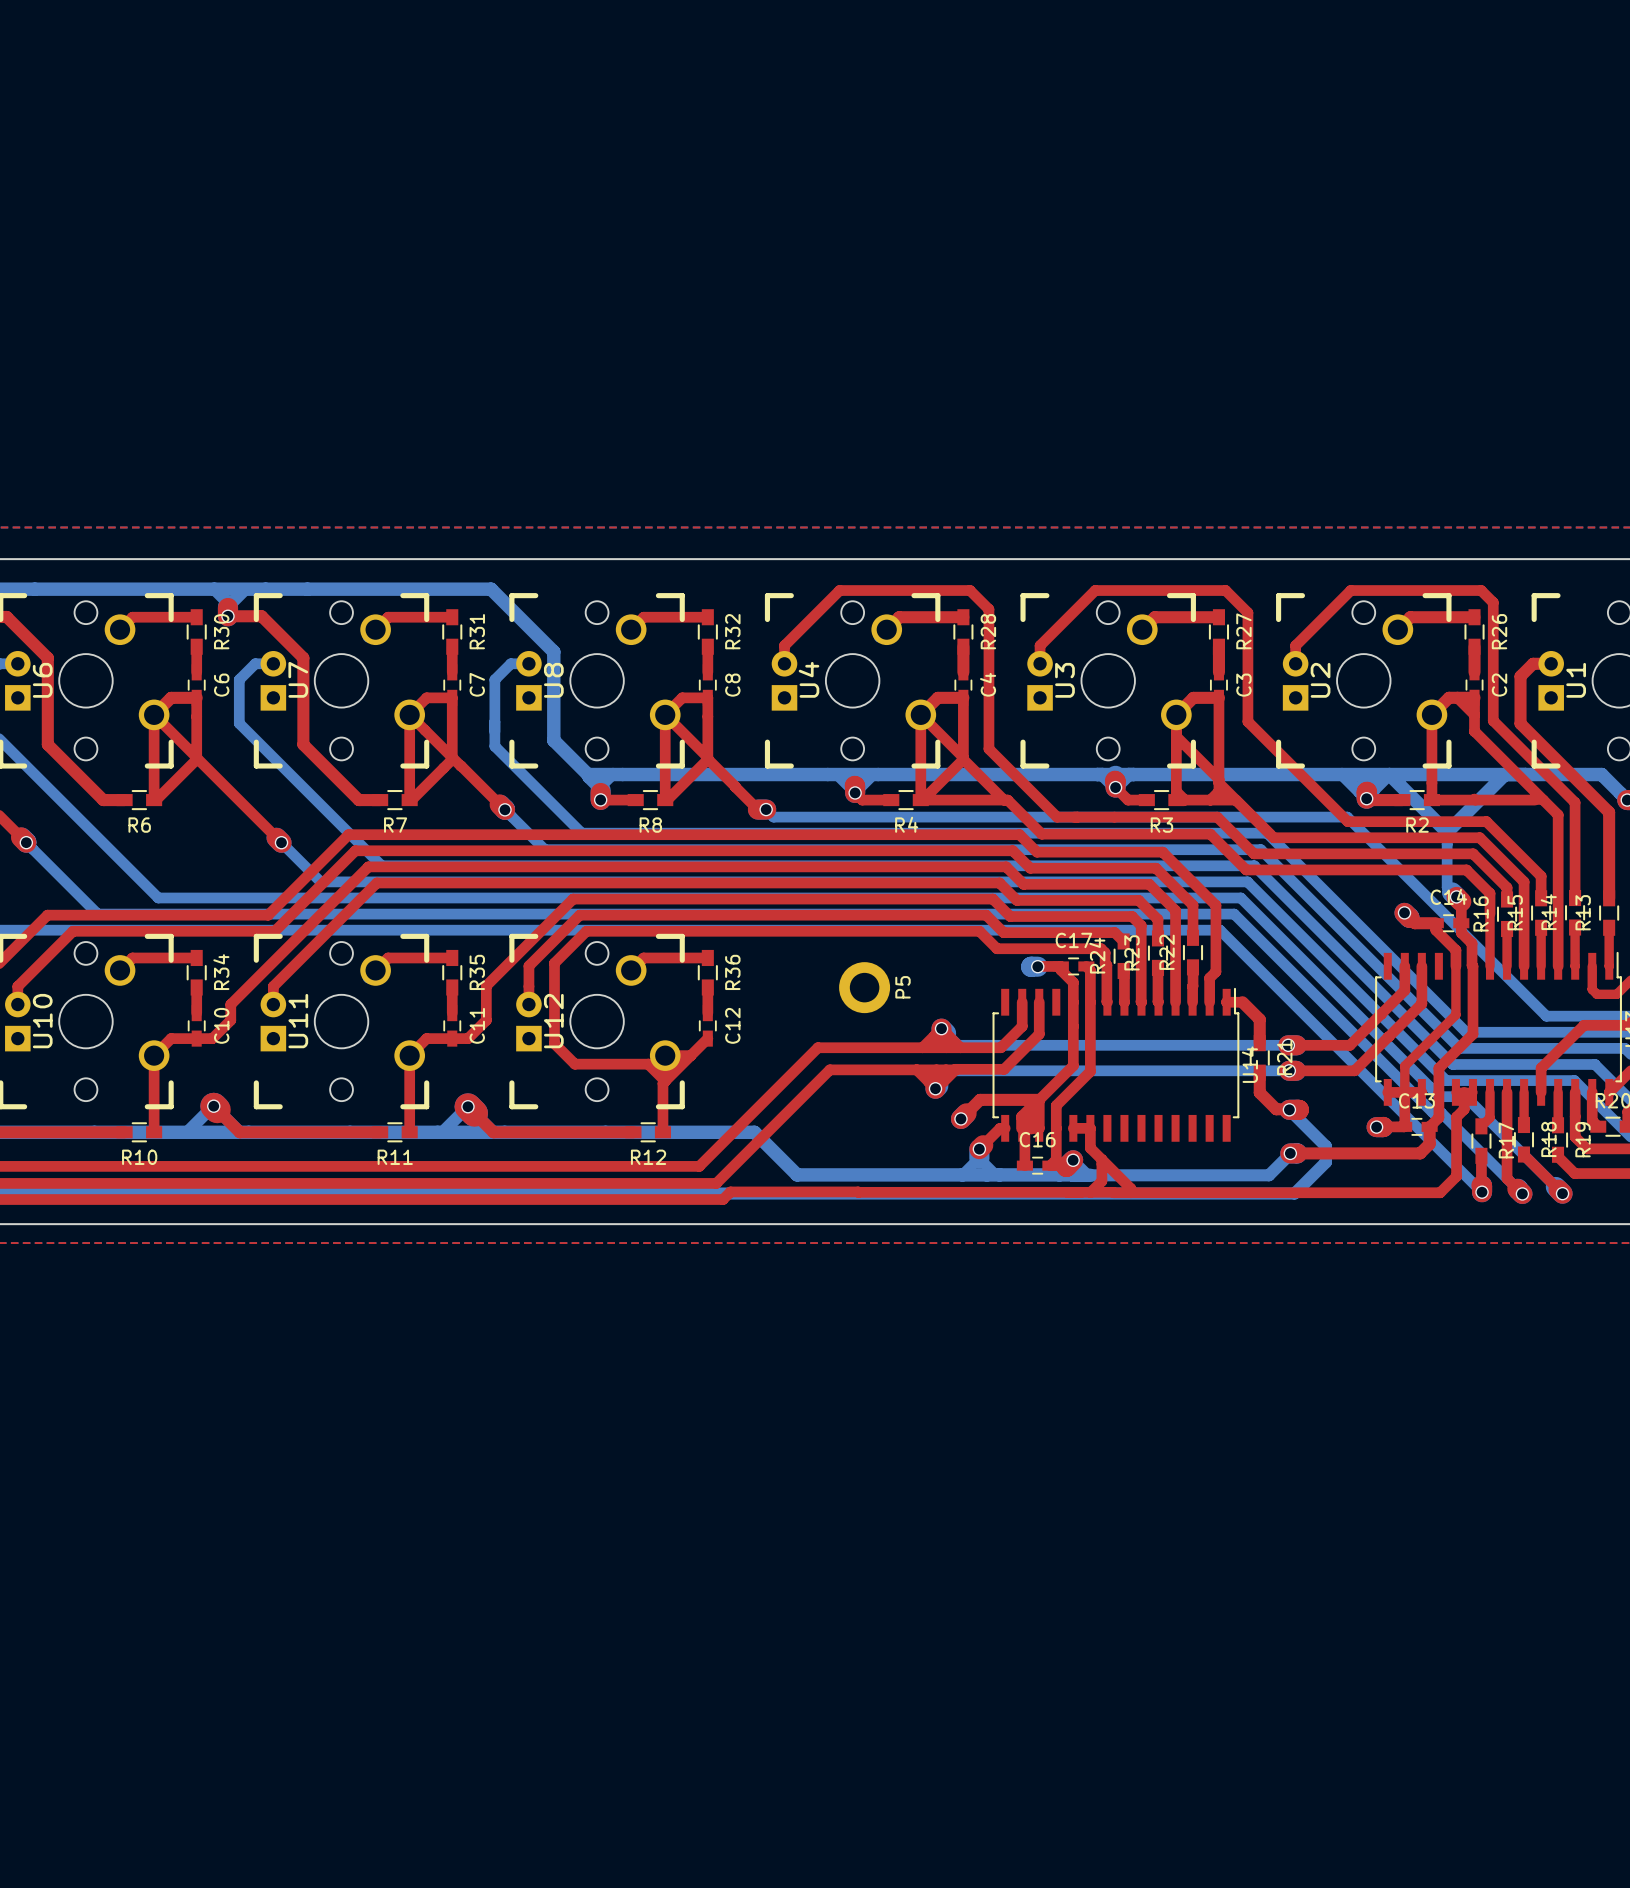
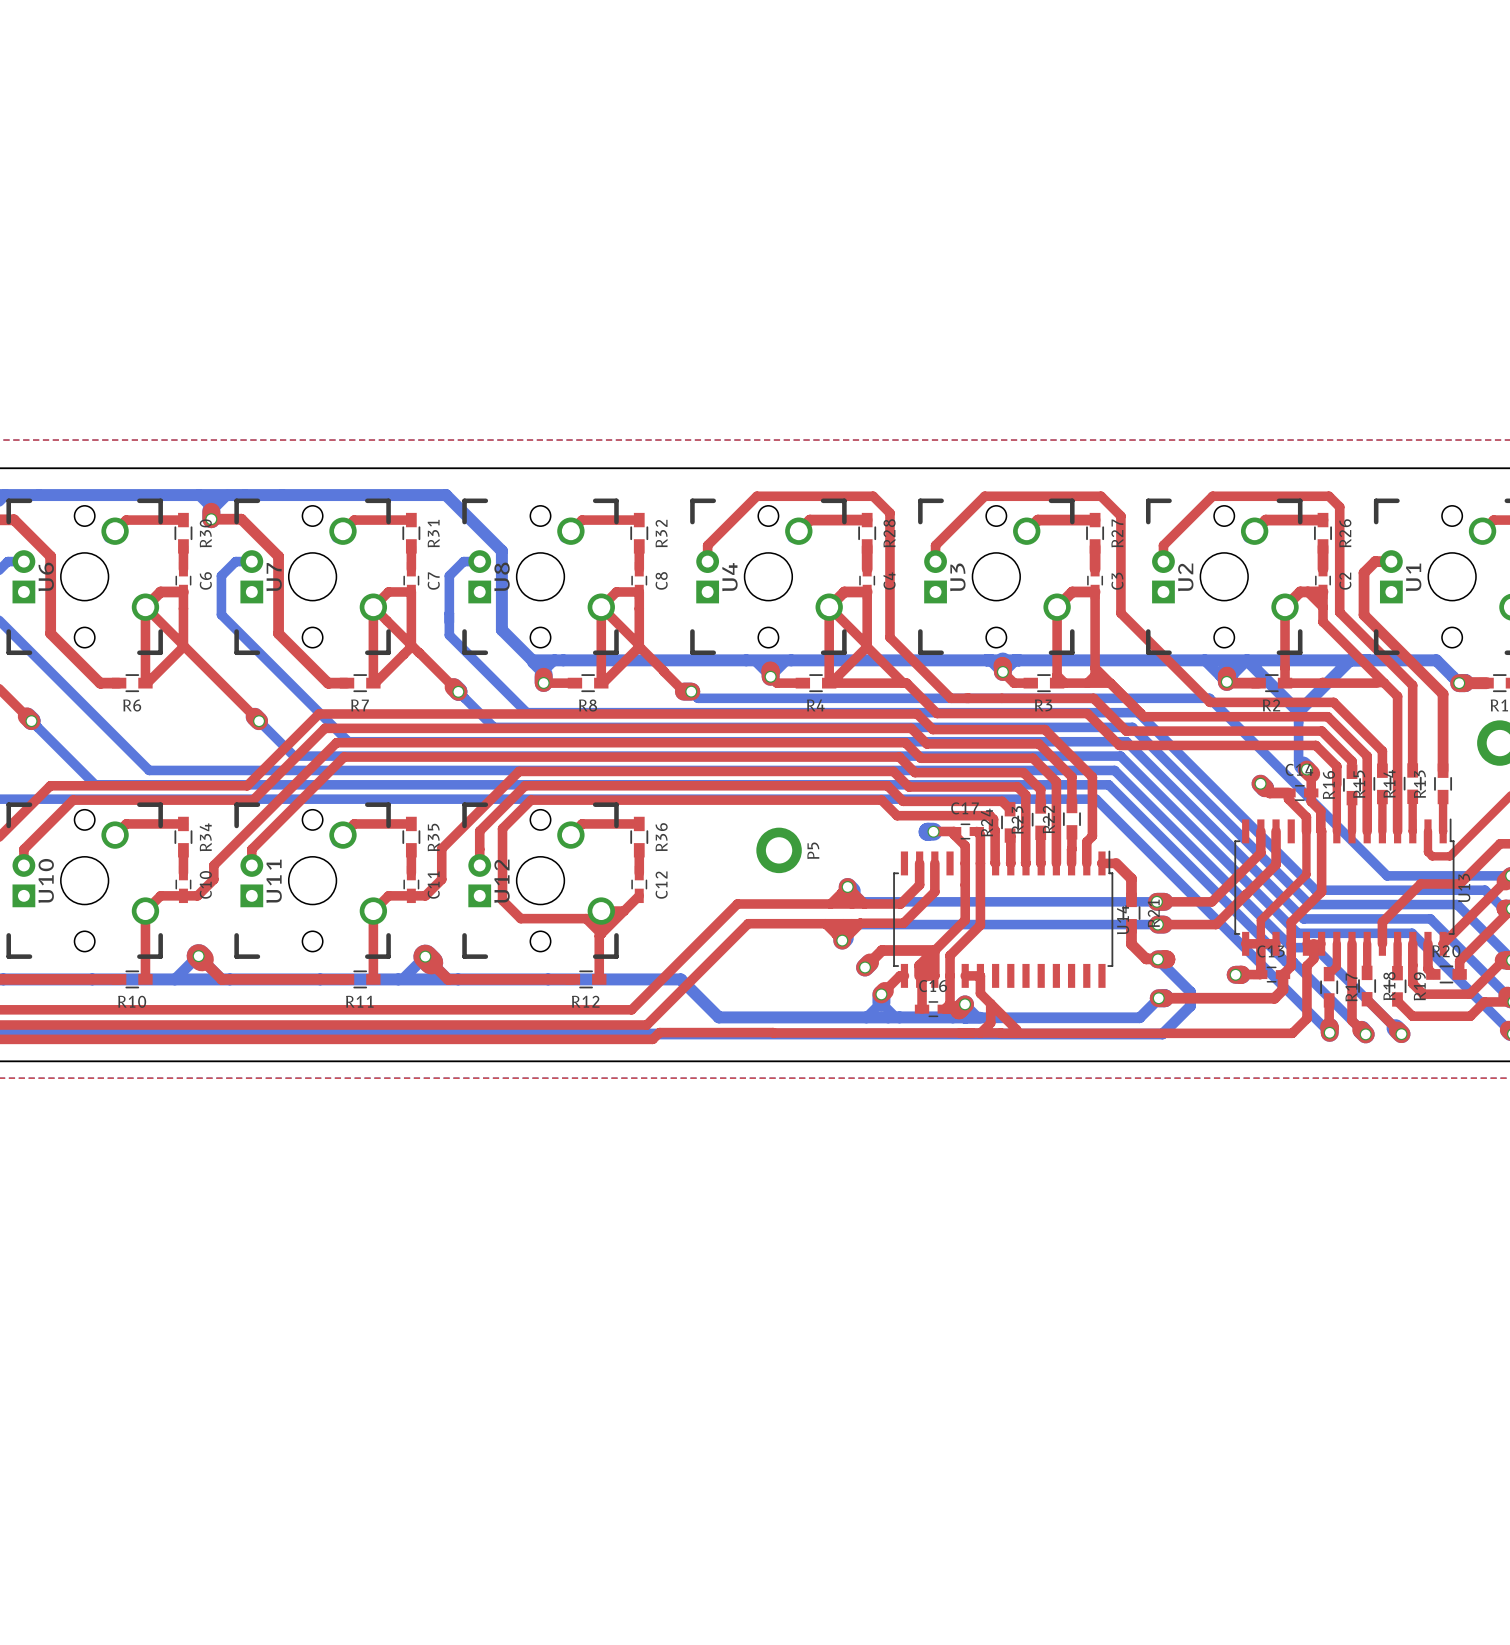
top track: (1176, 736) (1218, 779) -> none

